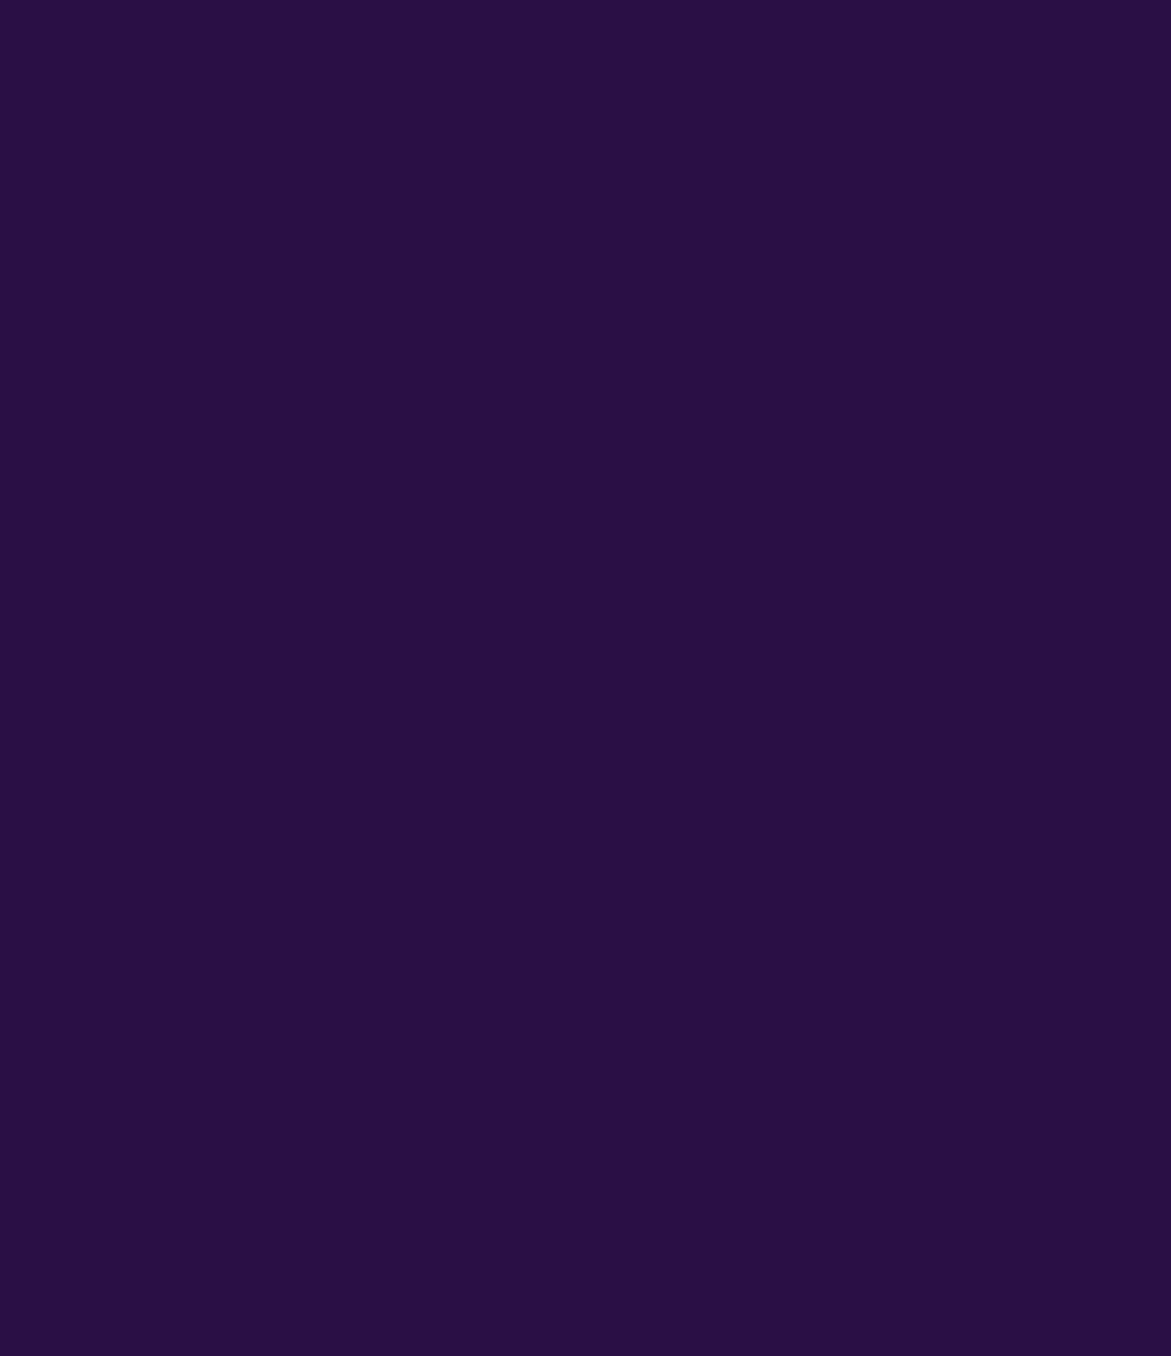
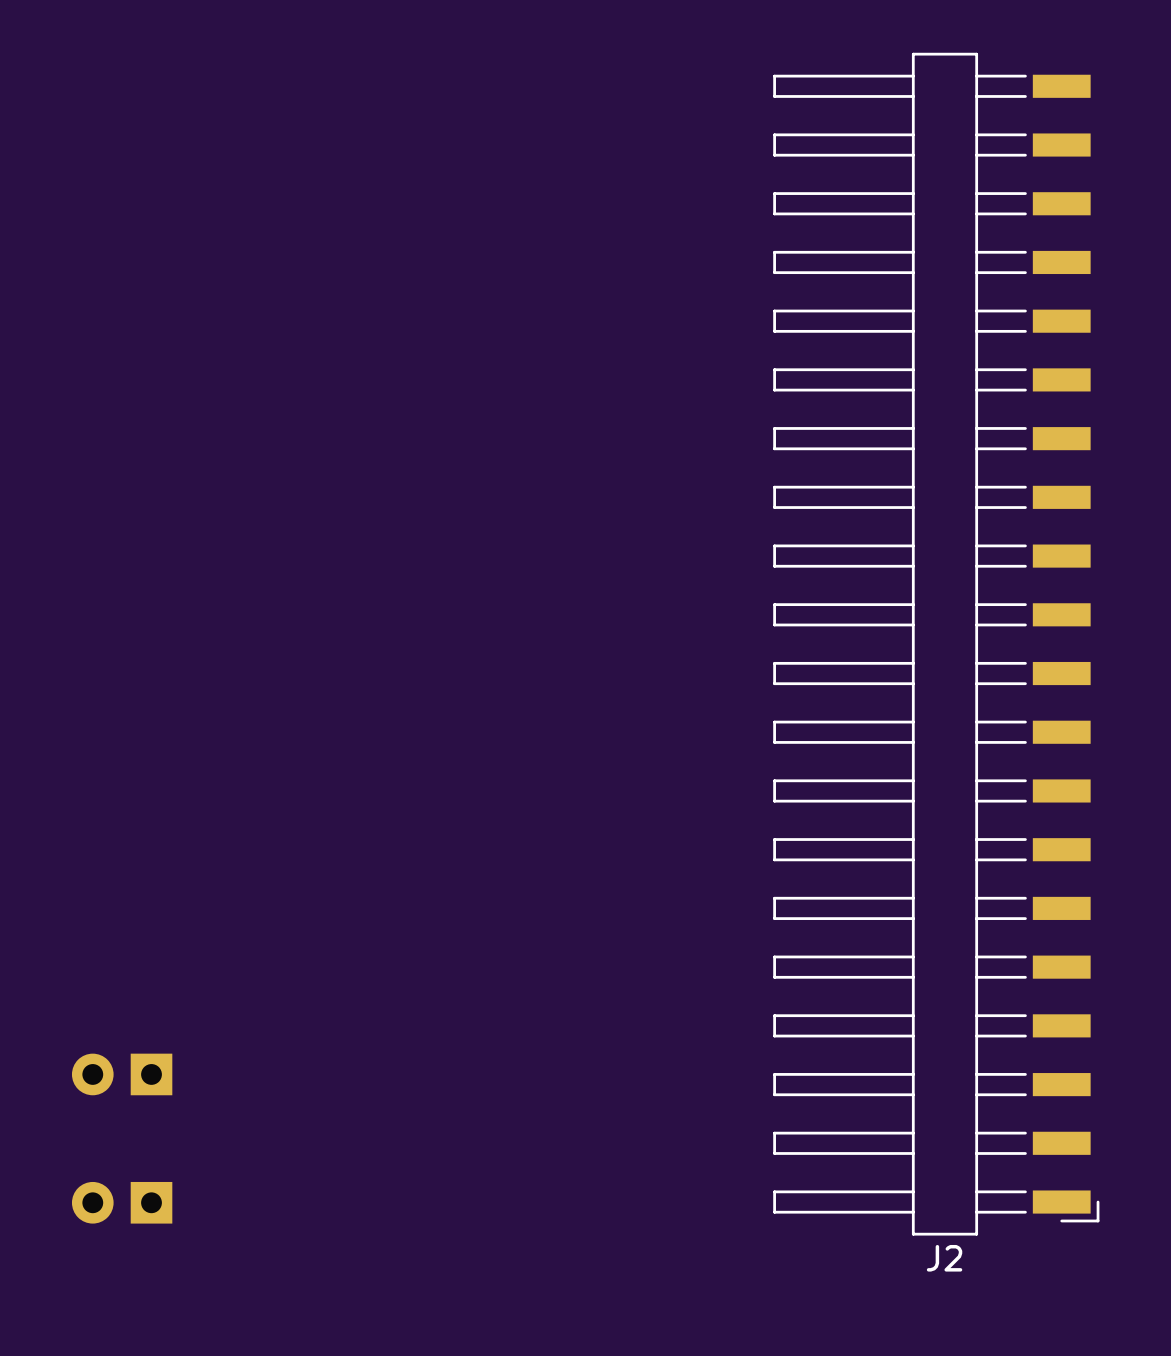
J2: none -> (936, 644)
part: none -> (122, 1074)
part: none -> (122, 1202)

